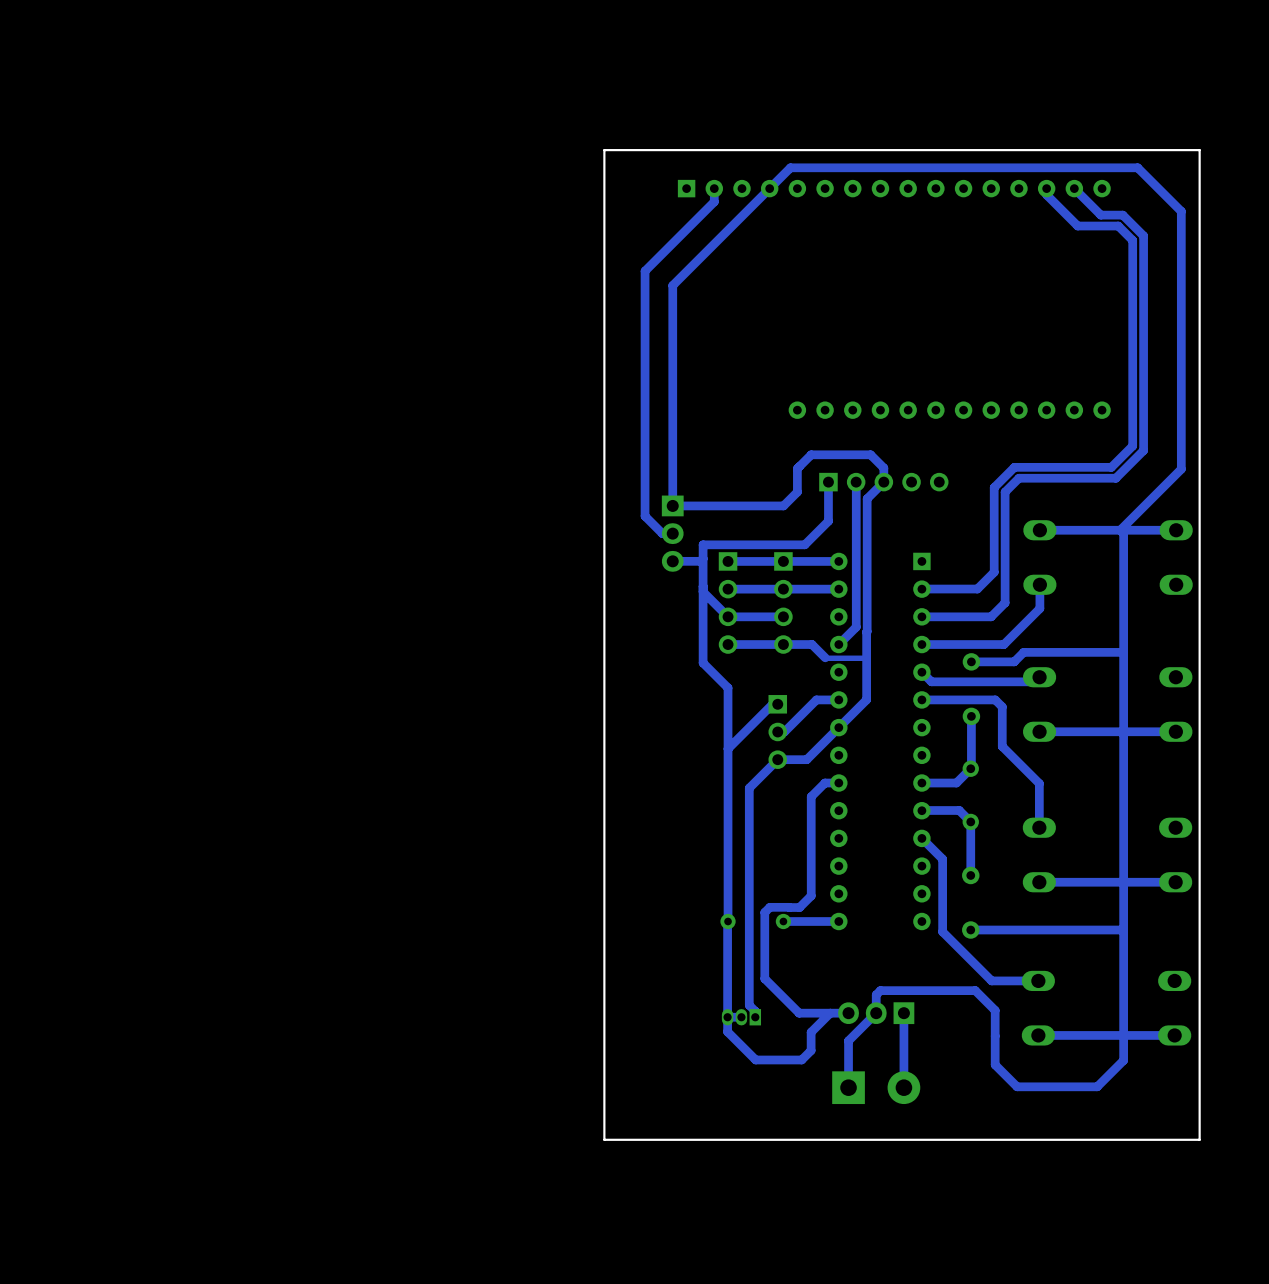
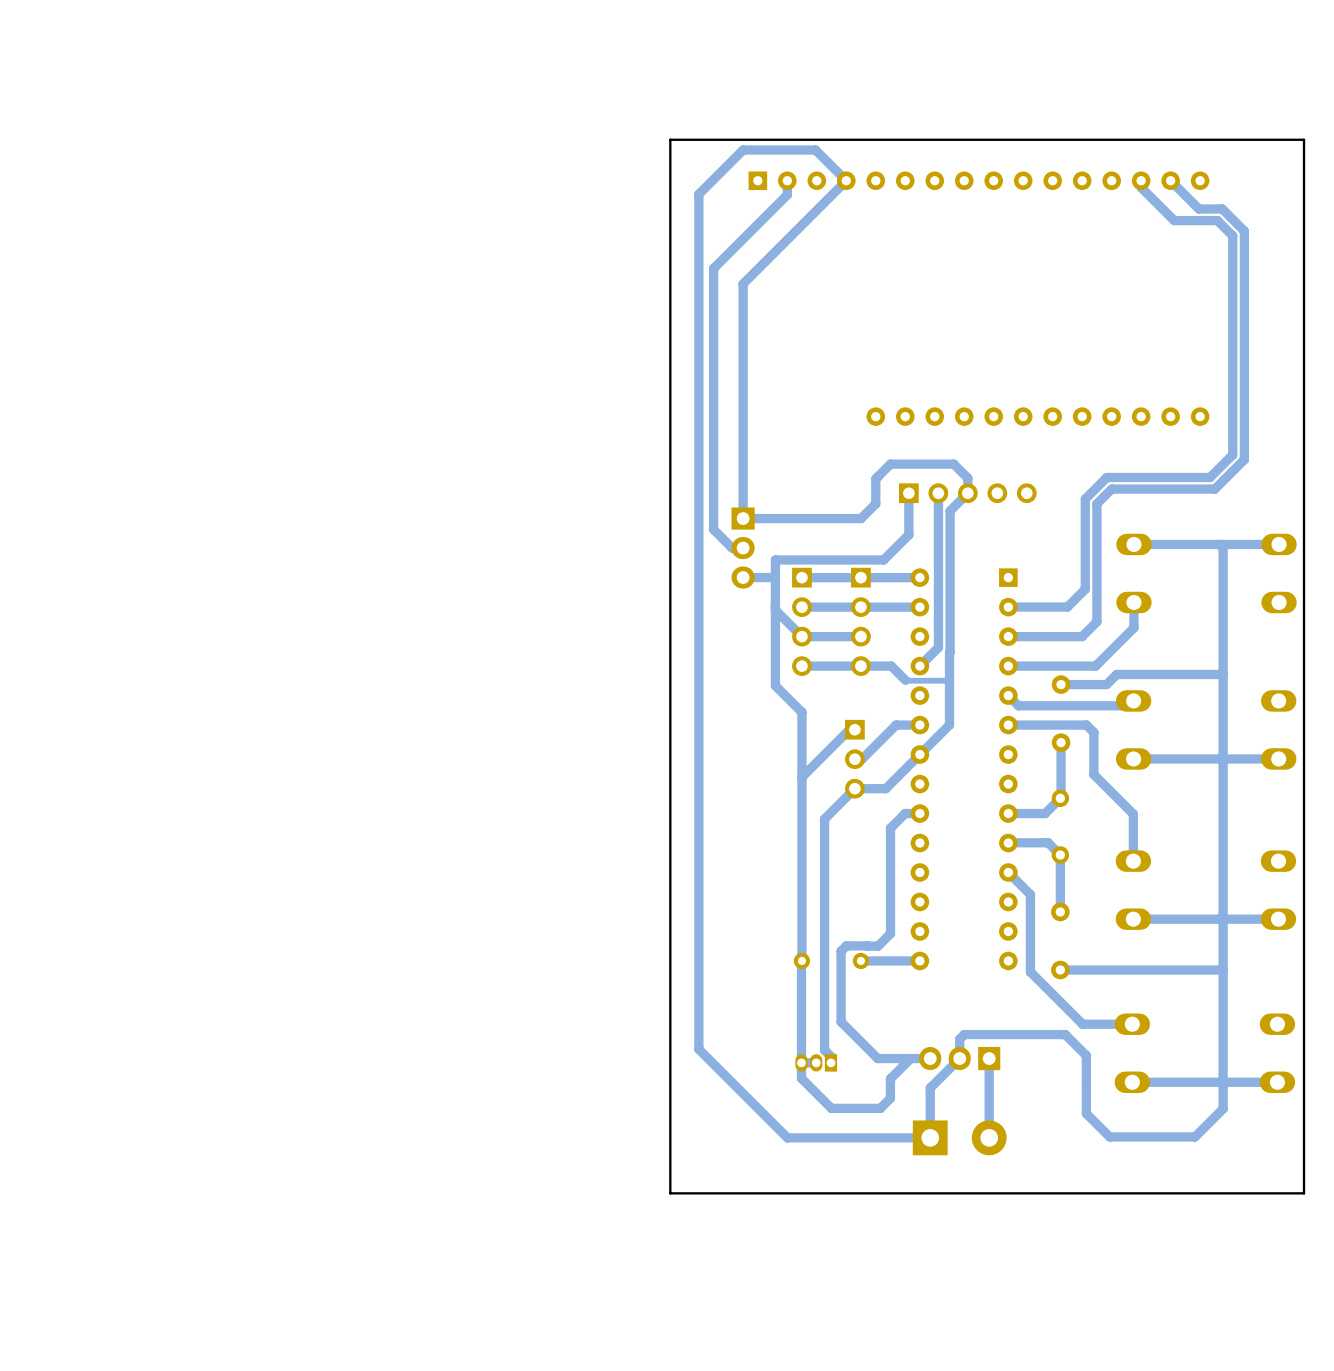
bottom track: (769, 188) (790, 167) (1137, 167) (1181, 211) (1181, 469) (1120, 530) -> (846, 180) (815, 150) (743, 150) (698, 194) (698, 1049) (787, 1137) (930, 1137)

